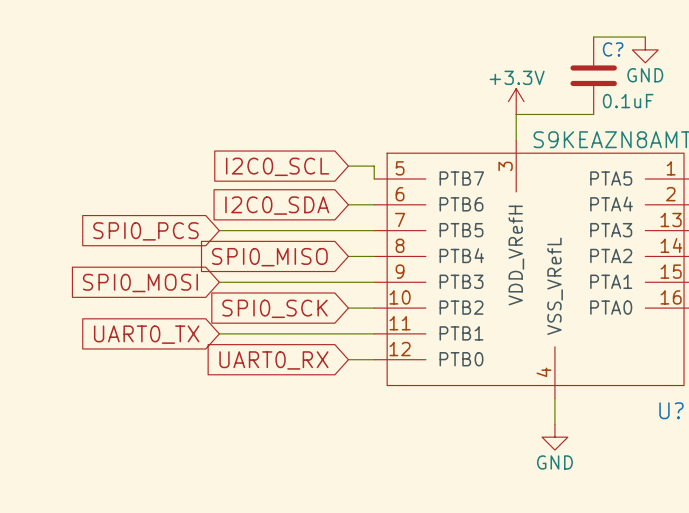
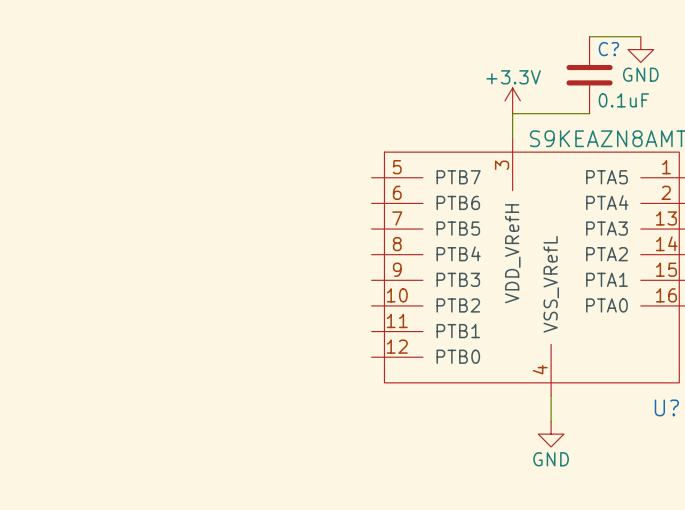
global label: I2C0_SCL (277, 166) -> none
wire: (348, 166) (374, 166) (374, 179) -> none
wire: (348, 204) (374, 204) -> none
global label: I2C0_SDA (277, 205) -> none
wire: (219, 230) (374, 230) -> none
global label: SPI0_PCS (145, 231) -> none
wire: (348, 256) (374, 256) -> none
global label: SPI0_MISO (269, 257) -> none
wire: (219, 282) (374, 282) -> none
global label: SPI0_MOSI (140, 283) -> none
global label: SPI0_SCK (275, 308) -> none
wire: (348, 308) (374, 308) -> none
wire: (219, 333) (374, 333) -> none
global label: UART0_TX (146, 334) -> none
wire: (348, 359) (374, 359) -> none
global label: UART0_RX (273, 360) -> none

